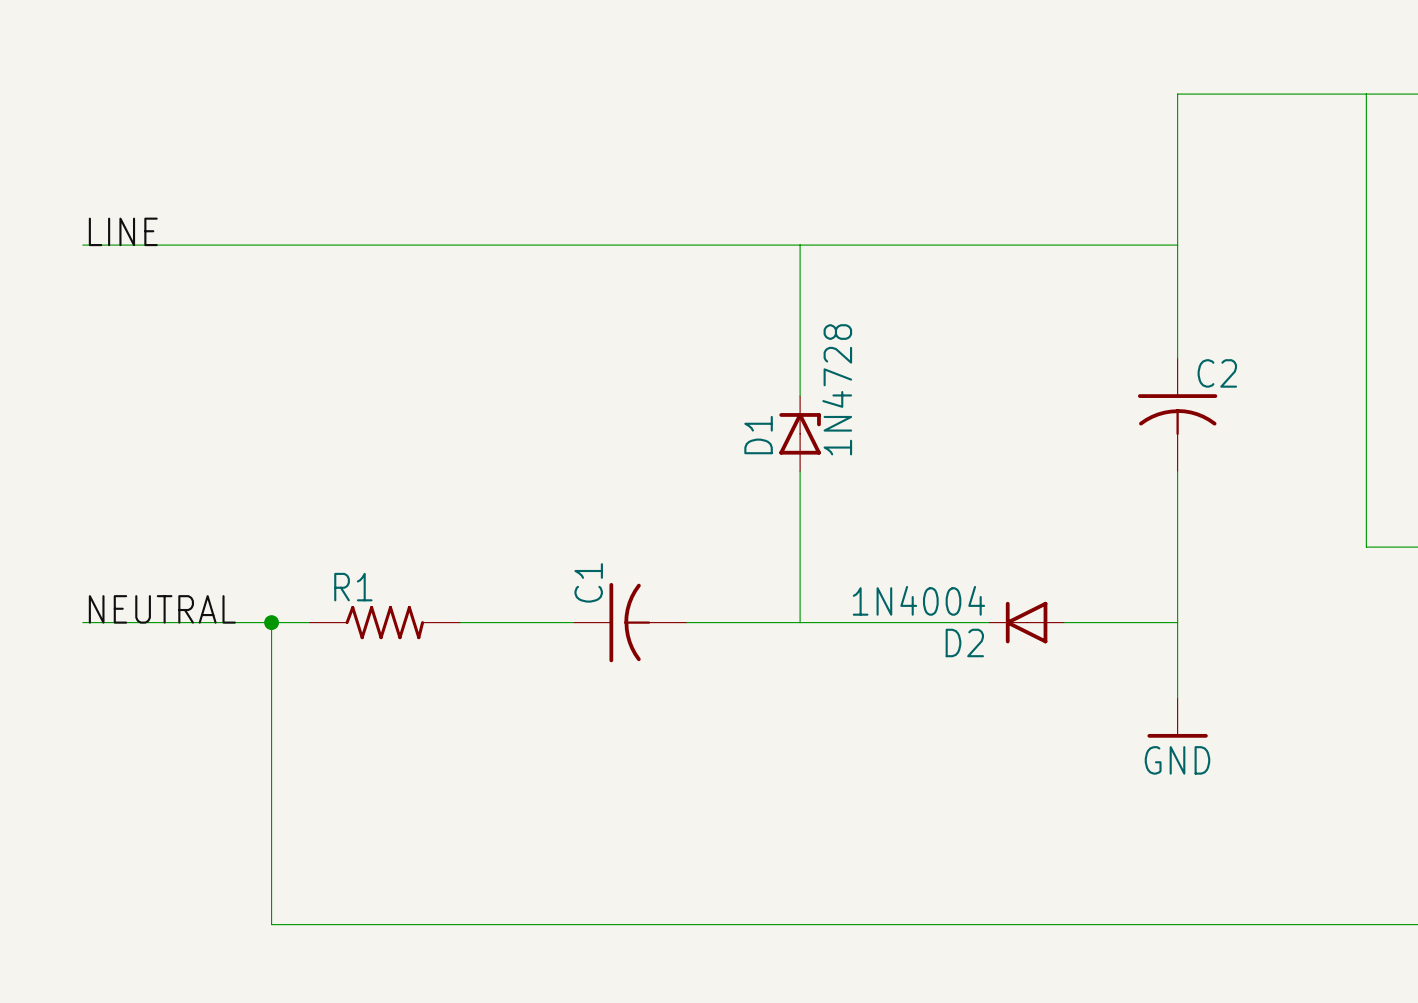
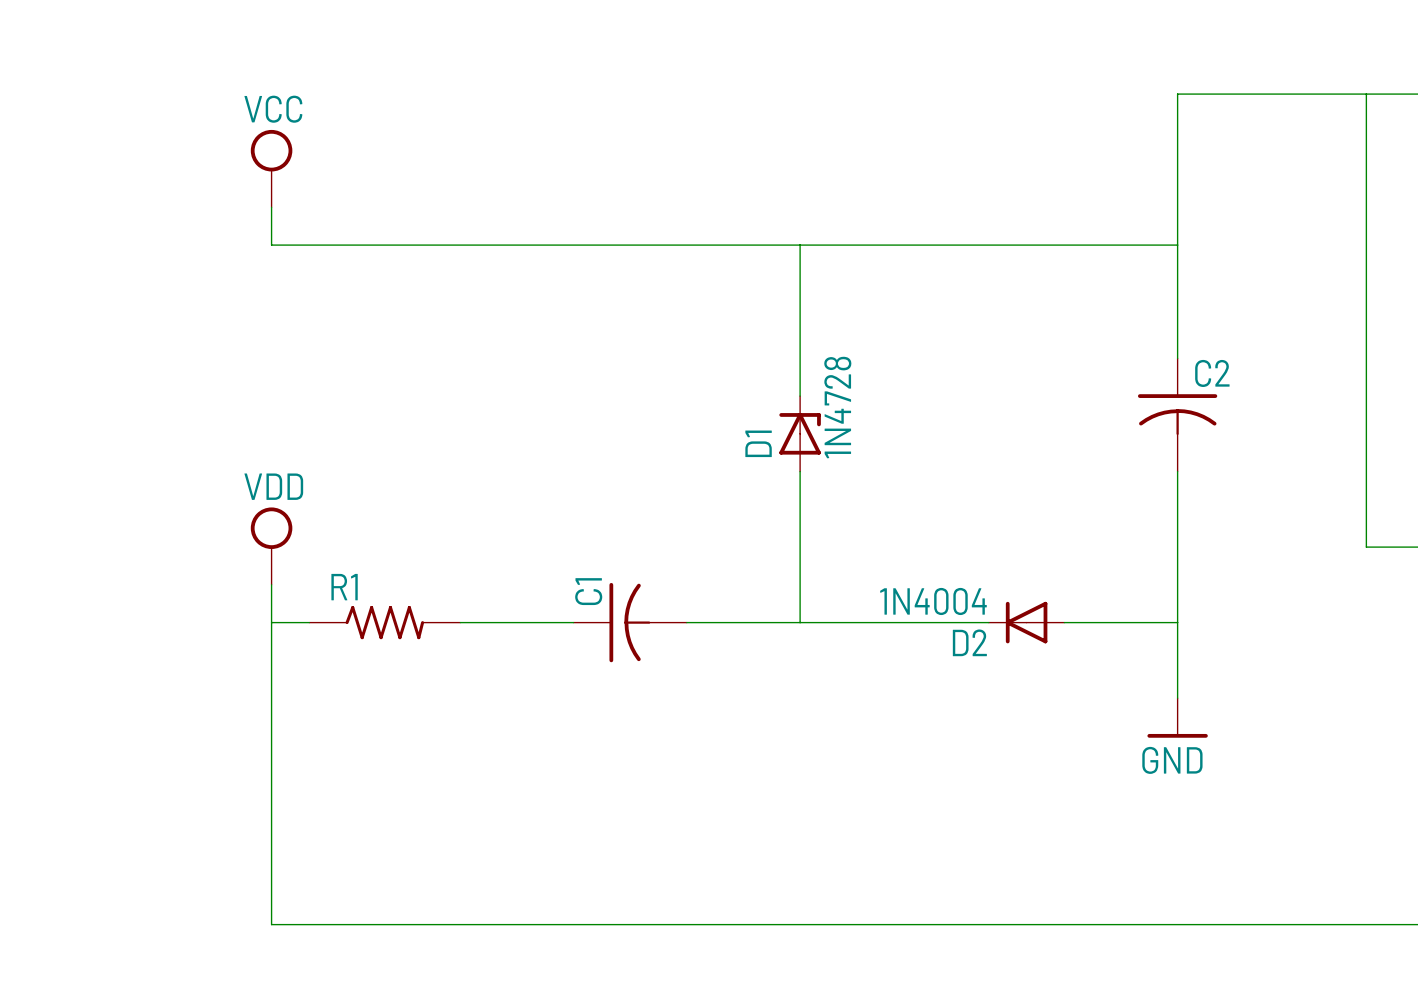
power symbol: none -> VCC (271, 168)
label: LINE (123, 231) -> none
wire: (82, 245) (271, 245) -> (271, 207) (271, 245)
power symbol: none -> VDD (271, 546)
label: NEUTRAL (162, 609) -> none
wire: (82, 622) (271, 622) -> (271, 584) (271, 622)
junction: (271, 622) -> none

